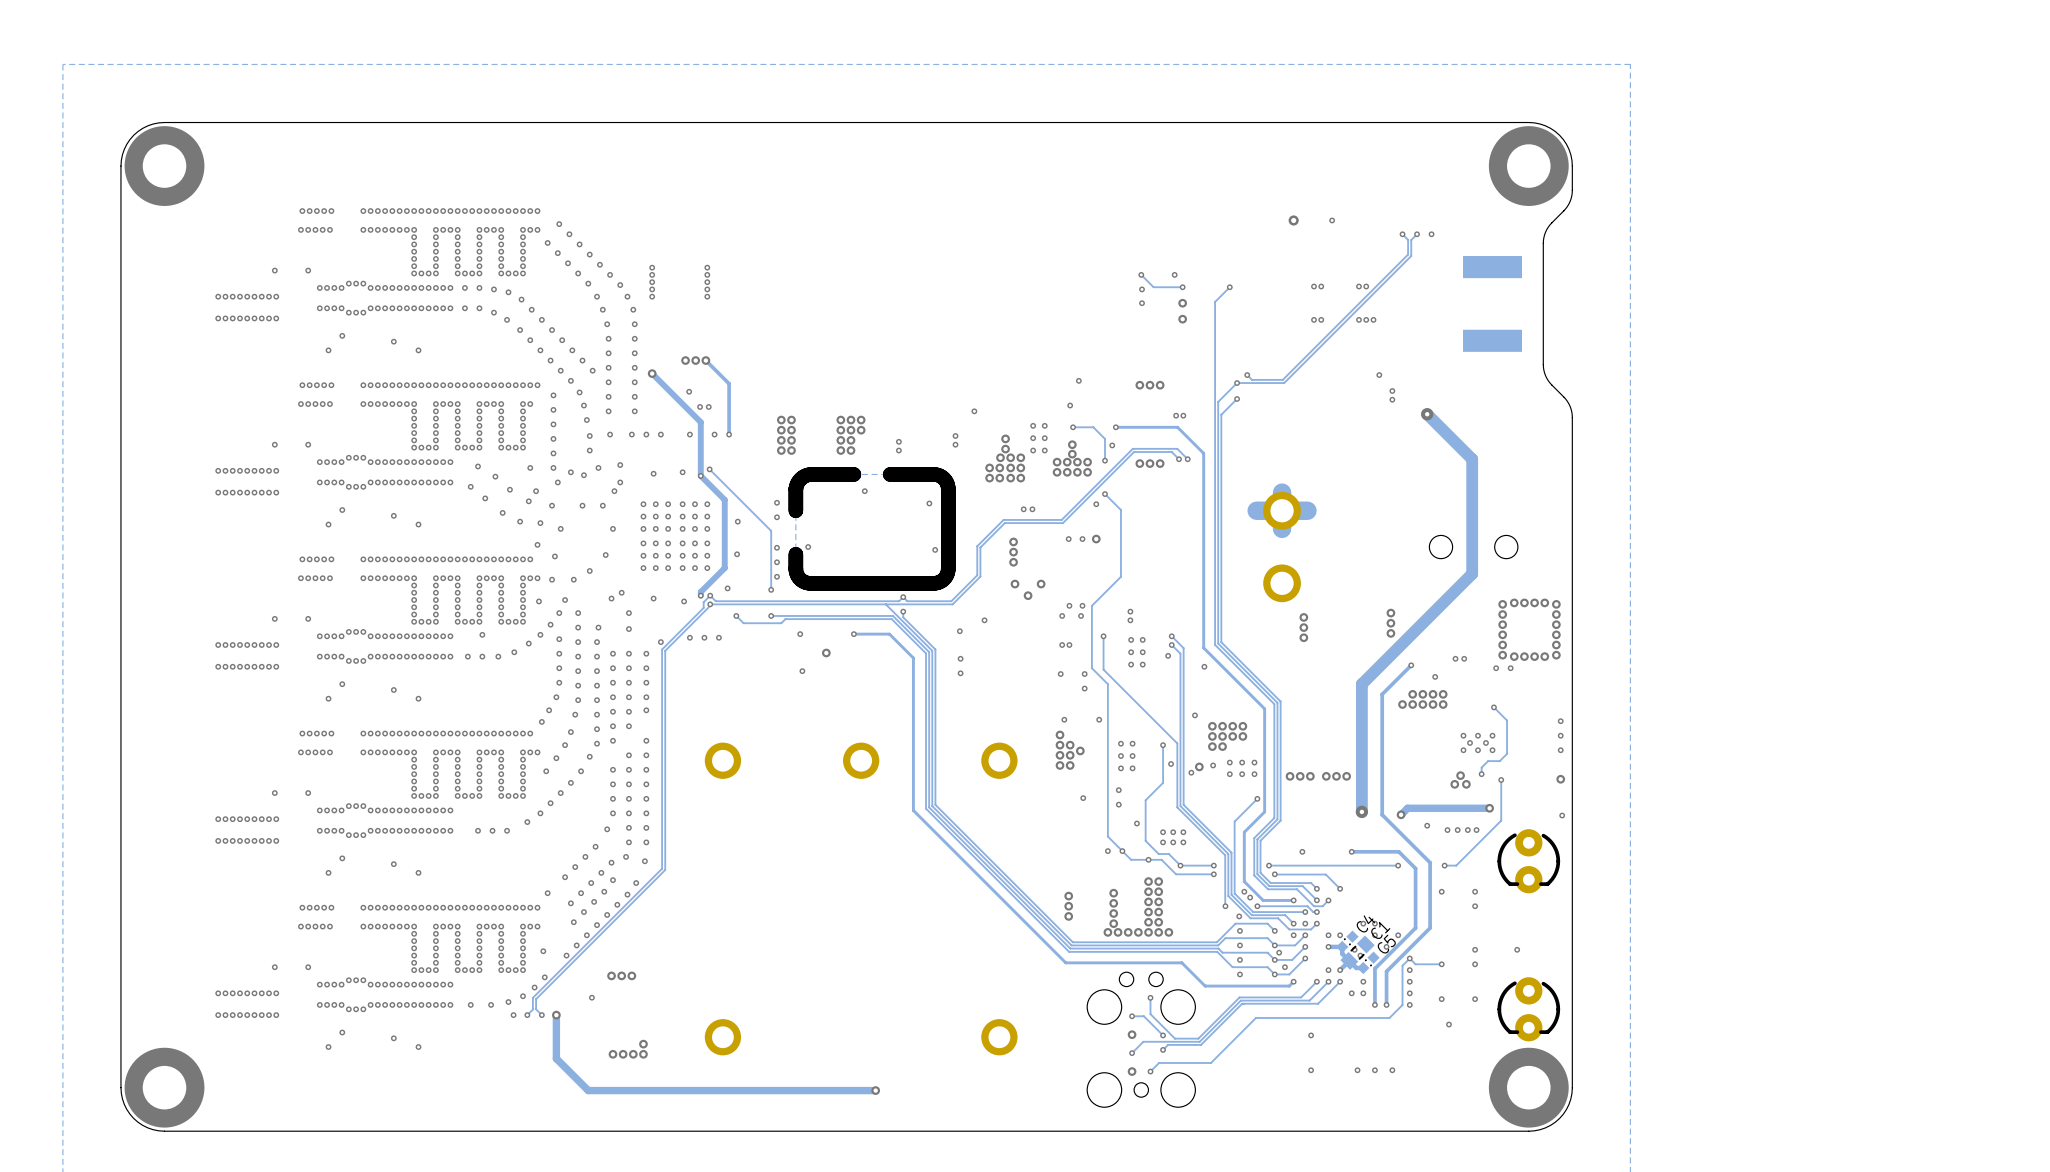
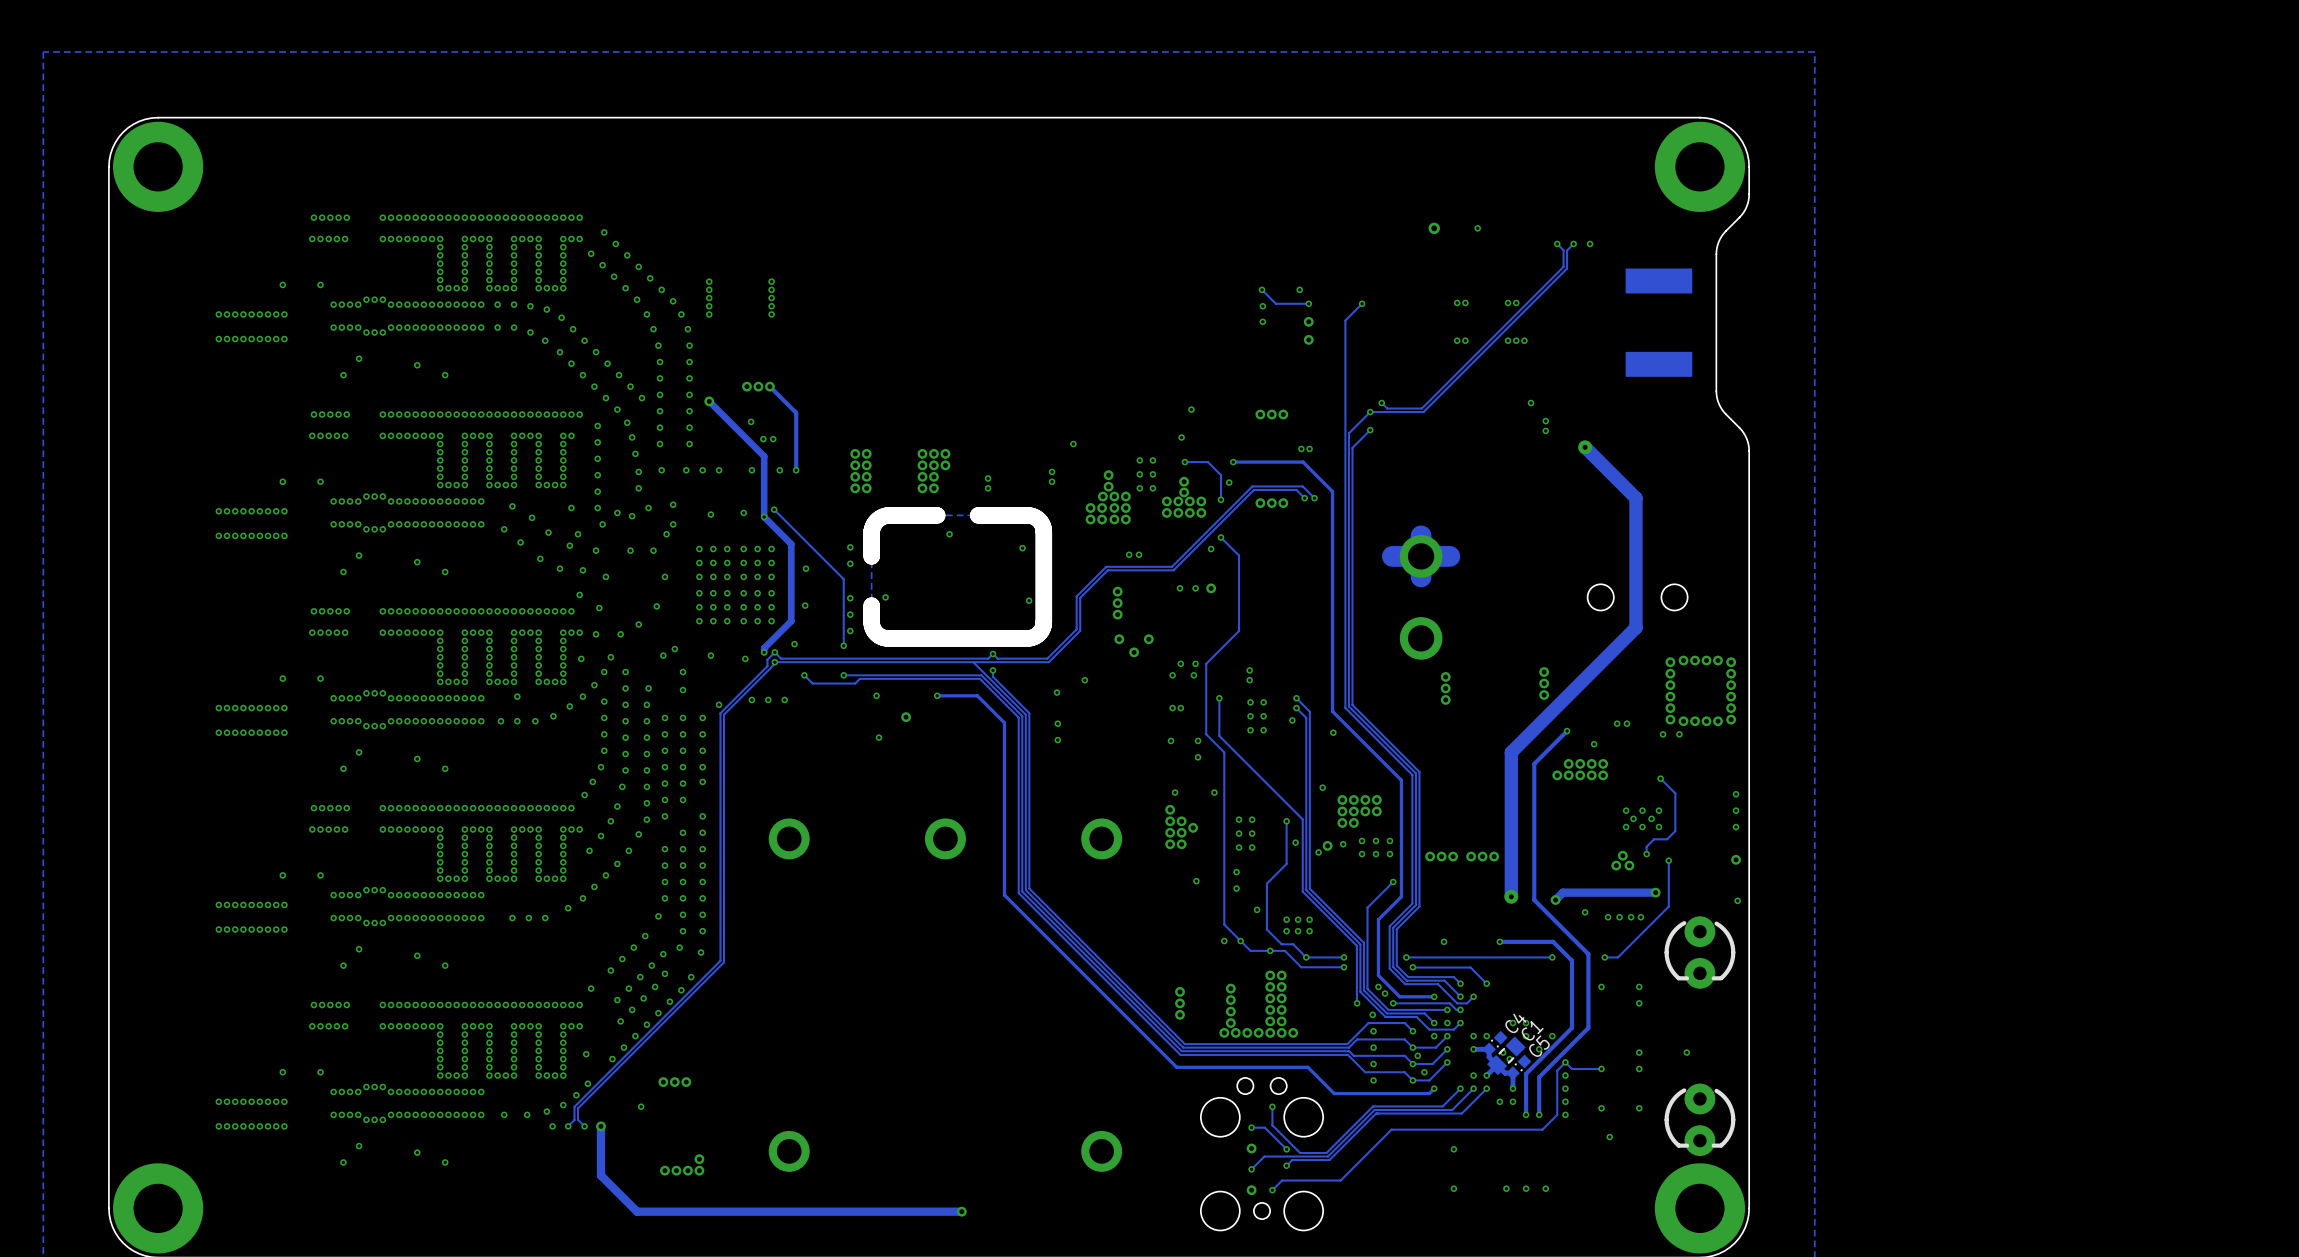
track: none -> (1512, 1073) (1512, 1088)

